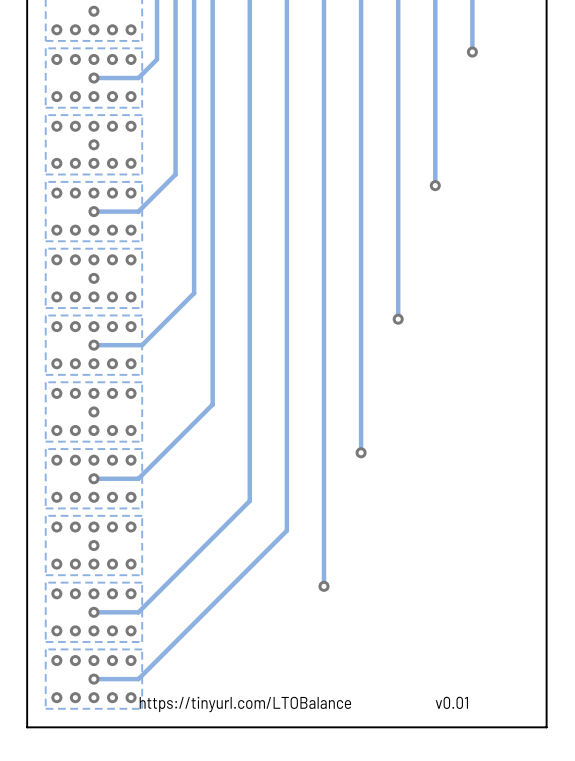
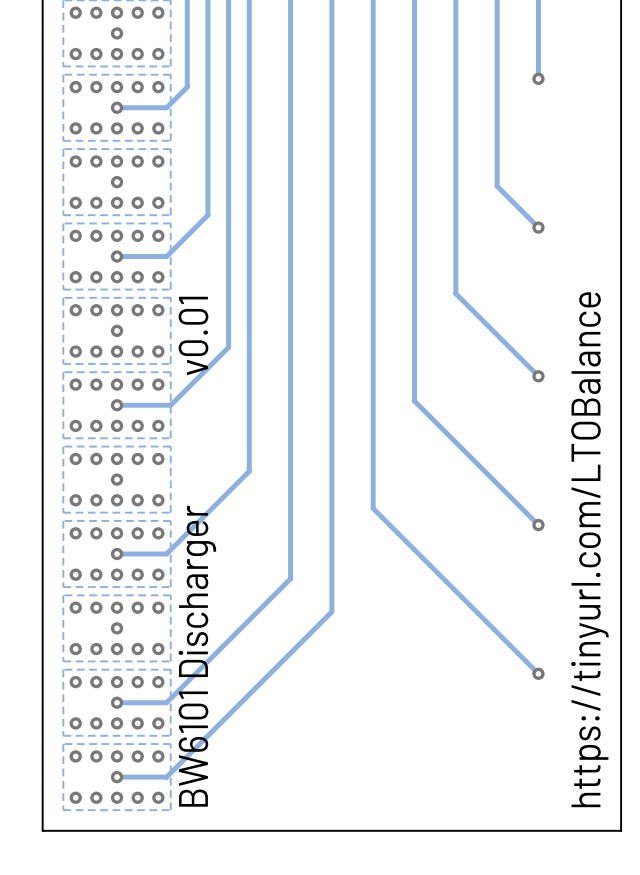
track: (435, 148) (435, 185) -> (497, 186) (538, 227)
via position: (435, 185) -> (538, 227)
track: (398, 244) (398, 319) -> (455, 293) (538, 376)
text: none -> v0.01 (193, 335)
via: (398, 319) -> none
via: none -> (538, 376)
track: (361, 341) (361, 452) -> (414, 401) (538, 525)
track: (323, 437) (323, 586) -> (373, 508) (538, 673)
via: (361, 452) -> none
via: none -> (538, 525)
text: none -> https://tinyurl.com/LTOBalance (589, 549)
text: none -> BW6101 Discharger (197, 656)
via: (323, 586) -> none
via: none -> (538, 673)
text: v0.01 (451, 702) -> none
text: https://tinyurl.com/LTOBalance (245, 704) -> none

